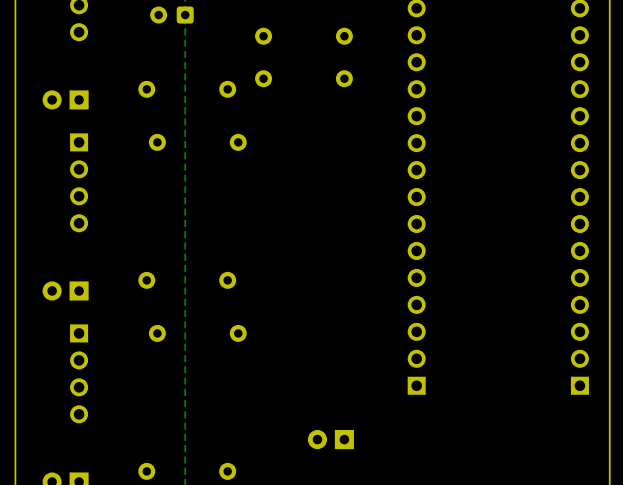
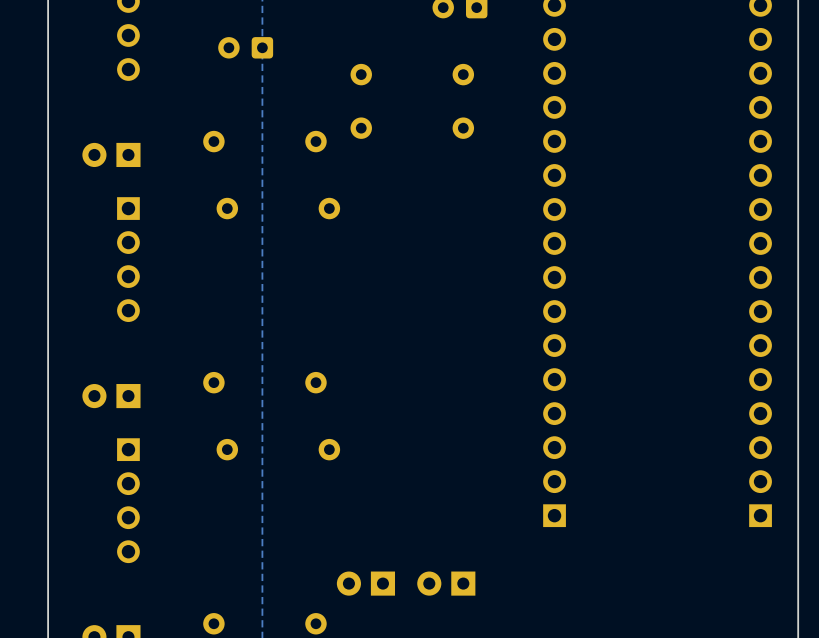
part: none -> (365, 583)

